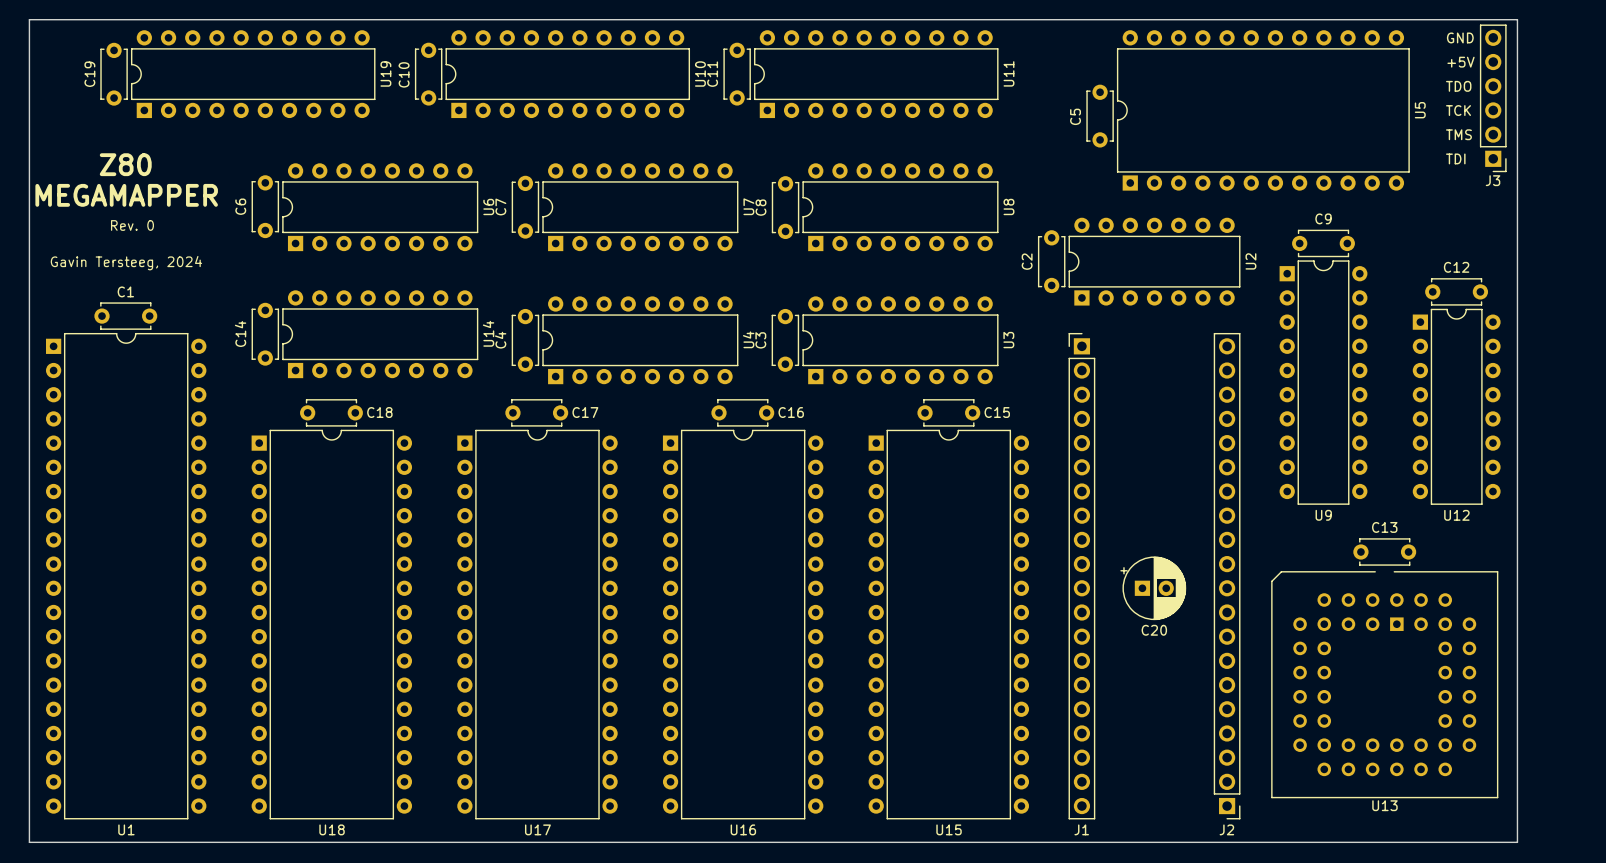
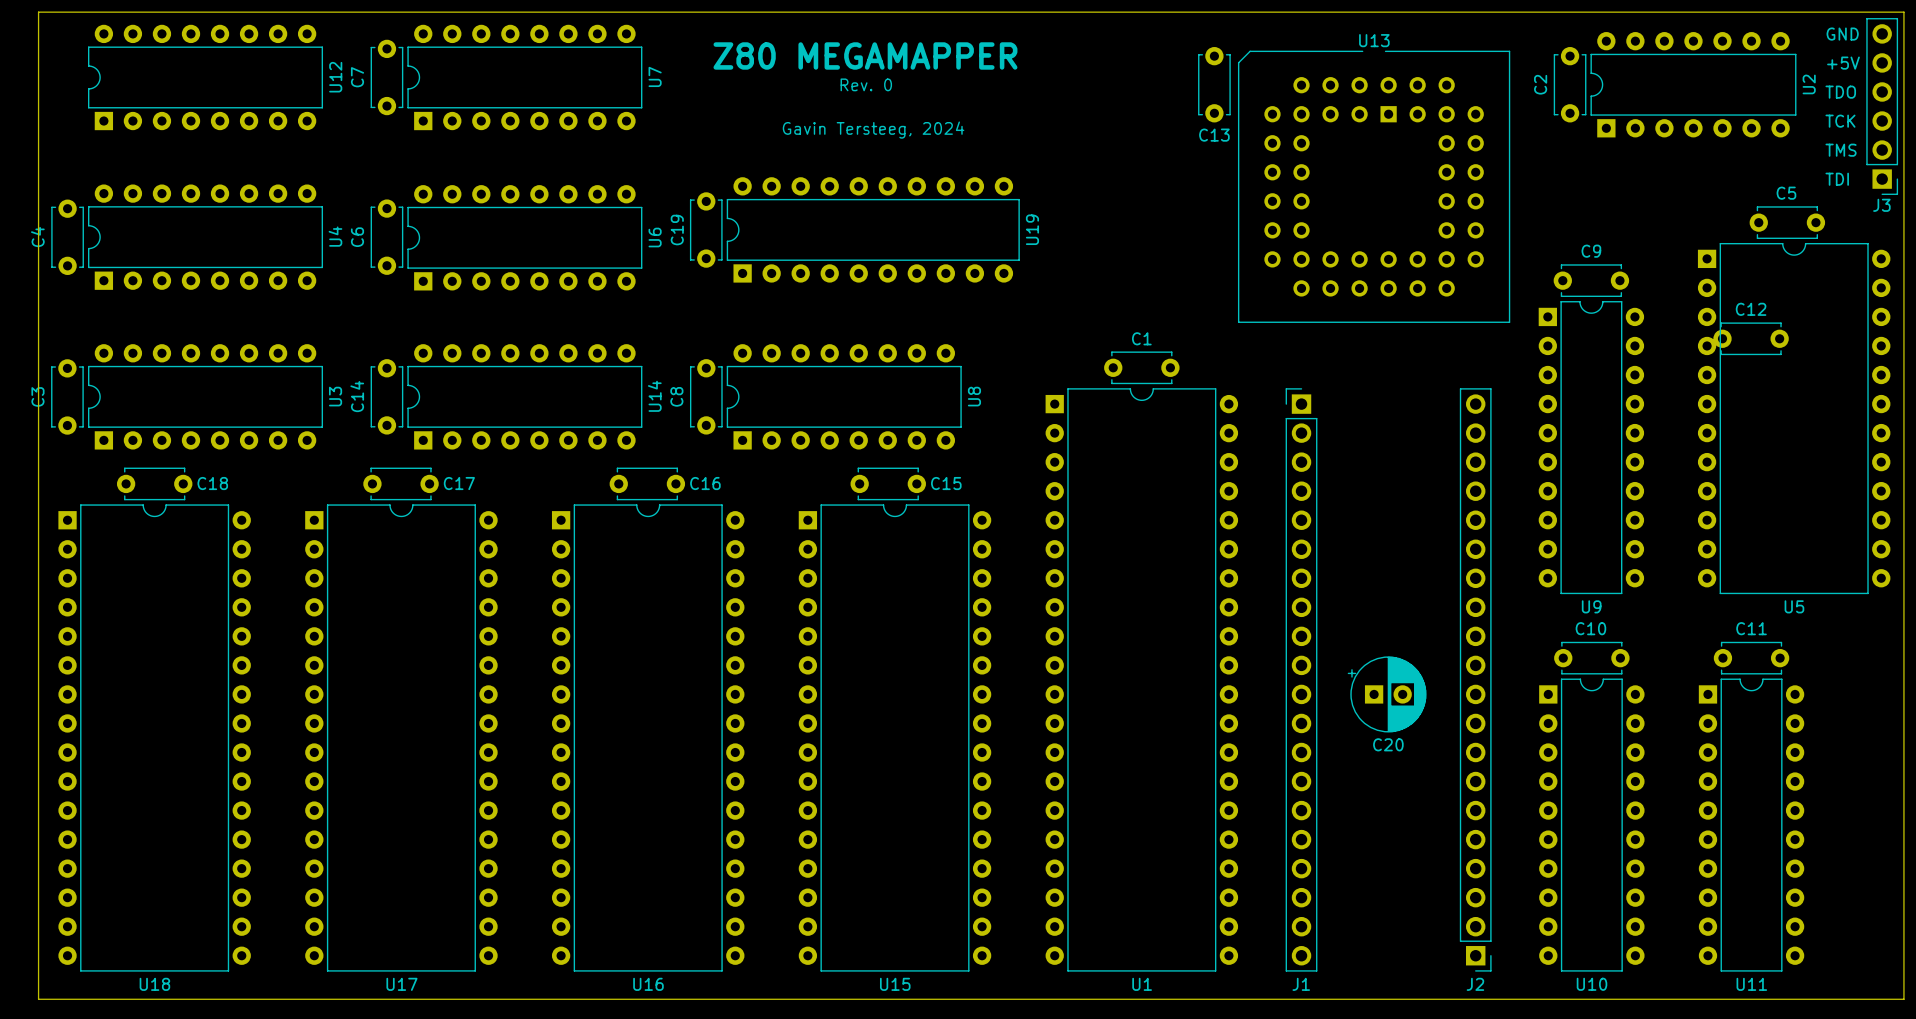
board edge: (1517, 19) (1517, 842) -> (1824, 12) (1903, 12) (1903, 999) (1824, 999)
text position: GND (1460, 37) -> GND (1842, 34)
text: none -> Z80 MEGAMAPPER (865, 55)
text position: +5V (1461, 62) -> +5V (1843, 63)
C19 position: (114, 74) -> (706, 230)
U19 position: (253, 74) -> (873, 229)
C10 rotation: 0° (428, 74) -> 90° clockwise (1591, 658)
C10 position: (428, 74) -> (1591, 658)
U10 rotation: 0° (567, 74) -> 90° clockwise (1591, 825)
U10 position: (567, 74) -> (1591, 825)
C11 rotation: 0° (737, 74) -> 90° clockwise (1751, 658)
C11 position: (737, 74) -> (1751, 658)
U11 rotation: 0° (876, 74) -> 90° clockwise (1751, 825)
U11 position: (876, 74) -> (1751, 825)
text: none -> Rev. 0 (866, 84)
text position: TDO (1458, 86) -> TDO (1840, 92)
J3 position: (1493, 98) -> (1882, 106)
U5 rotation: 0° (1263, 110) -> 90° clockwise (1794, 418)
U5 position: (1263, 110) -> (1794, 418)
text position: TCK (1458, 110) -> TCK (1840, 121)
C5 rotation: 0° (1100, 116) -> 90° clockwise (1787, 222)
C5 position: (1100, 116) -> (1787, 222)
text: none -> Gavin Tersteeg, 2024 (873, 130)
text position: TMS (1458, 134) -> TMS (1841, 150)
text position: TDI (1455, 158) -> TDI (1837, 179)
text: Z80 (125, 164) -> none
text: MEGAMAPPER (126, 195) -> none
C6 position: (265, 206) -> (386, 237)
U6 position: (380, 207) -> (524, 237)
C7 position: (525, 207) -> (386, 77)
U7 position: (640, 207) -> (524, 77)
C8 position: (785, 207) -> (706, 396)
U8 position: (900, 207) -> (844, 396)
text: Rev. 0 (132, 225) -> none
C2 position: (1051, 261) -> (1570, 84)
U2 position: (1154, 261) -> (1693, 84)
text: Gavin Tersteeg, 2024 (126, 263) -> none
C1 position: (125, 316) -> (1141, 367)
C14 position: (265, 334) -> (386, 396)
U14 position: (380, 334) -> (524, 396)
C4 position: (525, 340) -> (67, 237)
U4 position: (640, 340) -> (205, 237)
C3 position: (785, 340) -> (67, 396)
U3 position: (900, 340) -> (205, 396)
U12 rotation: 0° (1456, 406) -> 90° counterclockwise (205, 77)
U12 position: (1456, 406) -> (205, 77)
C18: none -> (154, 483)
C18 name: C18 (379, 412) -> C17 (459, 483)
C17 name: C17 (585, 412) -> C16 (705, 483)
C16: (742, 412) -> none
C15 position: (948, 412) -> (888, 483)
C13 name position: C13 (1384, 527) -> C13 (1214, 135)
C13 rotation: 0° (1384, 551) -> 90° clockwise (1214, 84)
C13 position: (1384, 551) -> (1214, 84)
U1 position: (126, 576) -> (1141, 679)
U18: none -> (154, 737)
U15: (948, 624) -> none
U13 position: (1384, 684) -> (1374, 186)
U13 name position: U13 (1384, 805) -> U13 (1374, 40)
U18 name: U18 (332, 829) -> U17 (401, 984)
U17 name: U17 (537, 829) -> U16 (648, 984)
U16 name: U16 (743, 829) -> U15 (895, 984)

